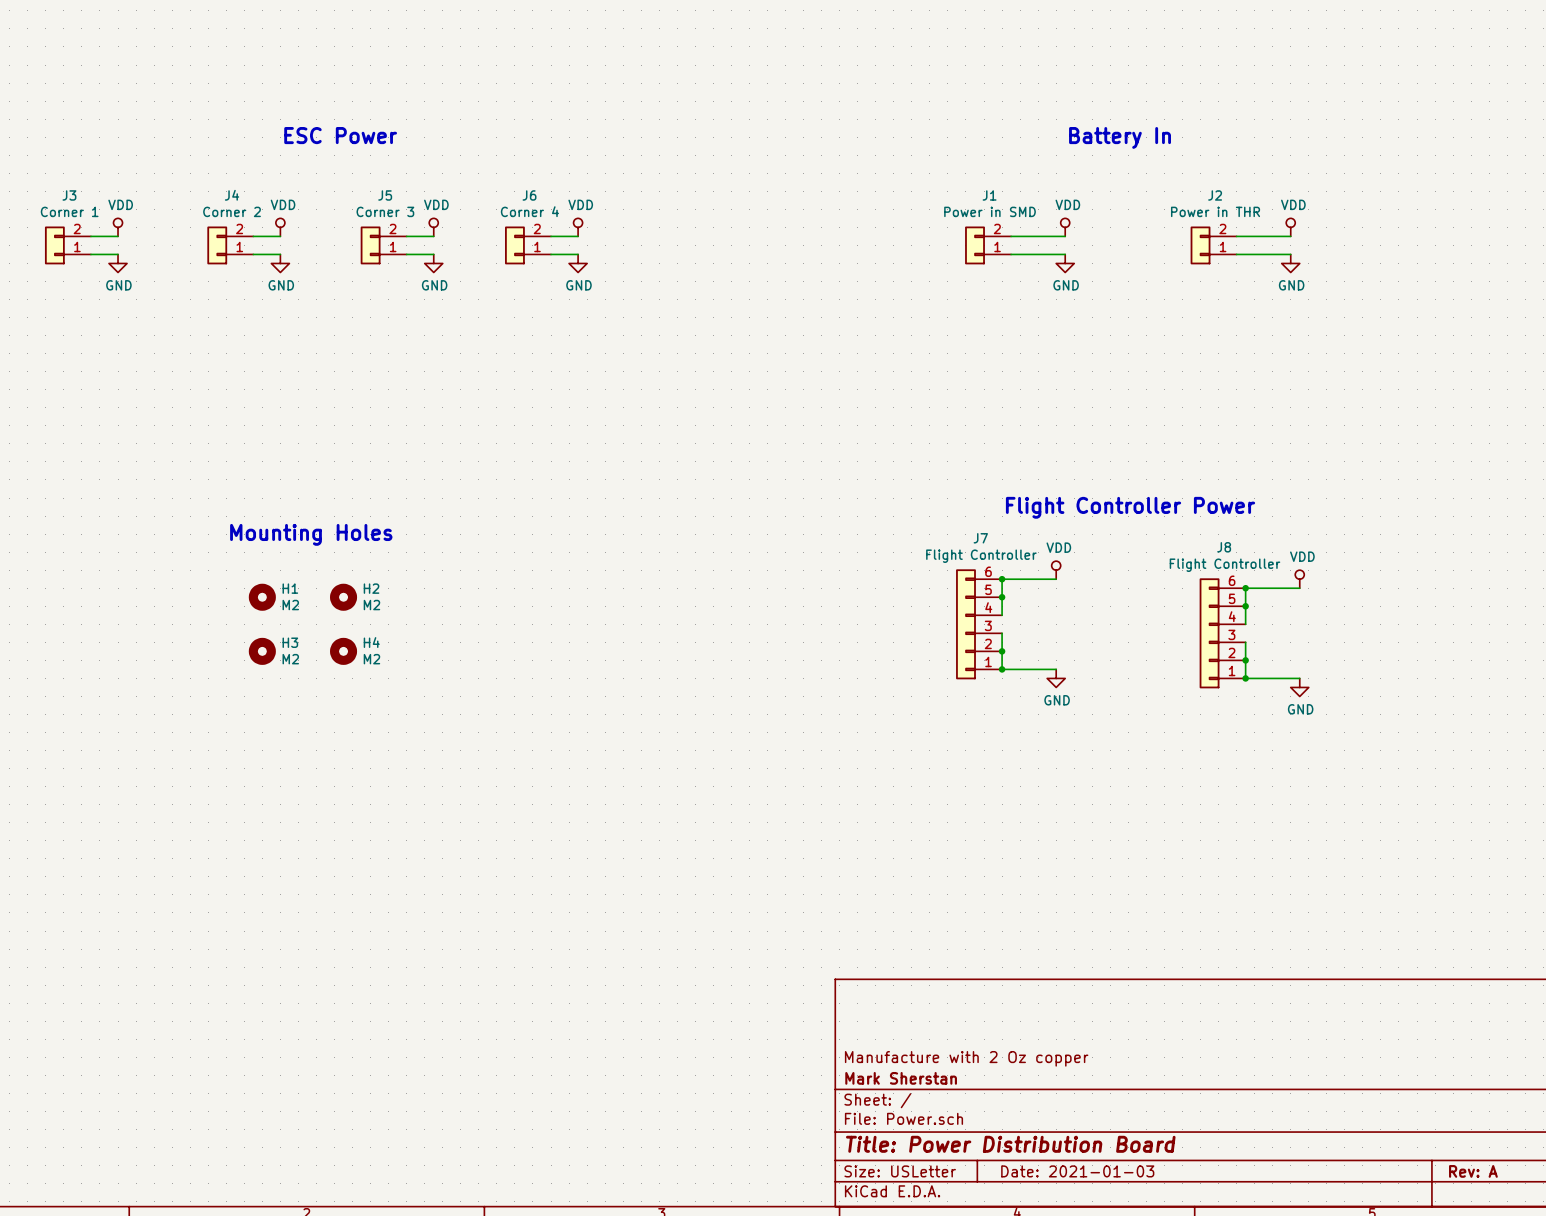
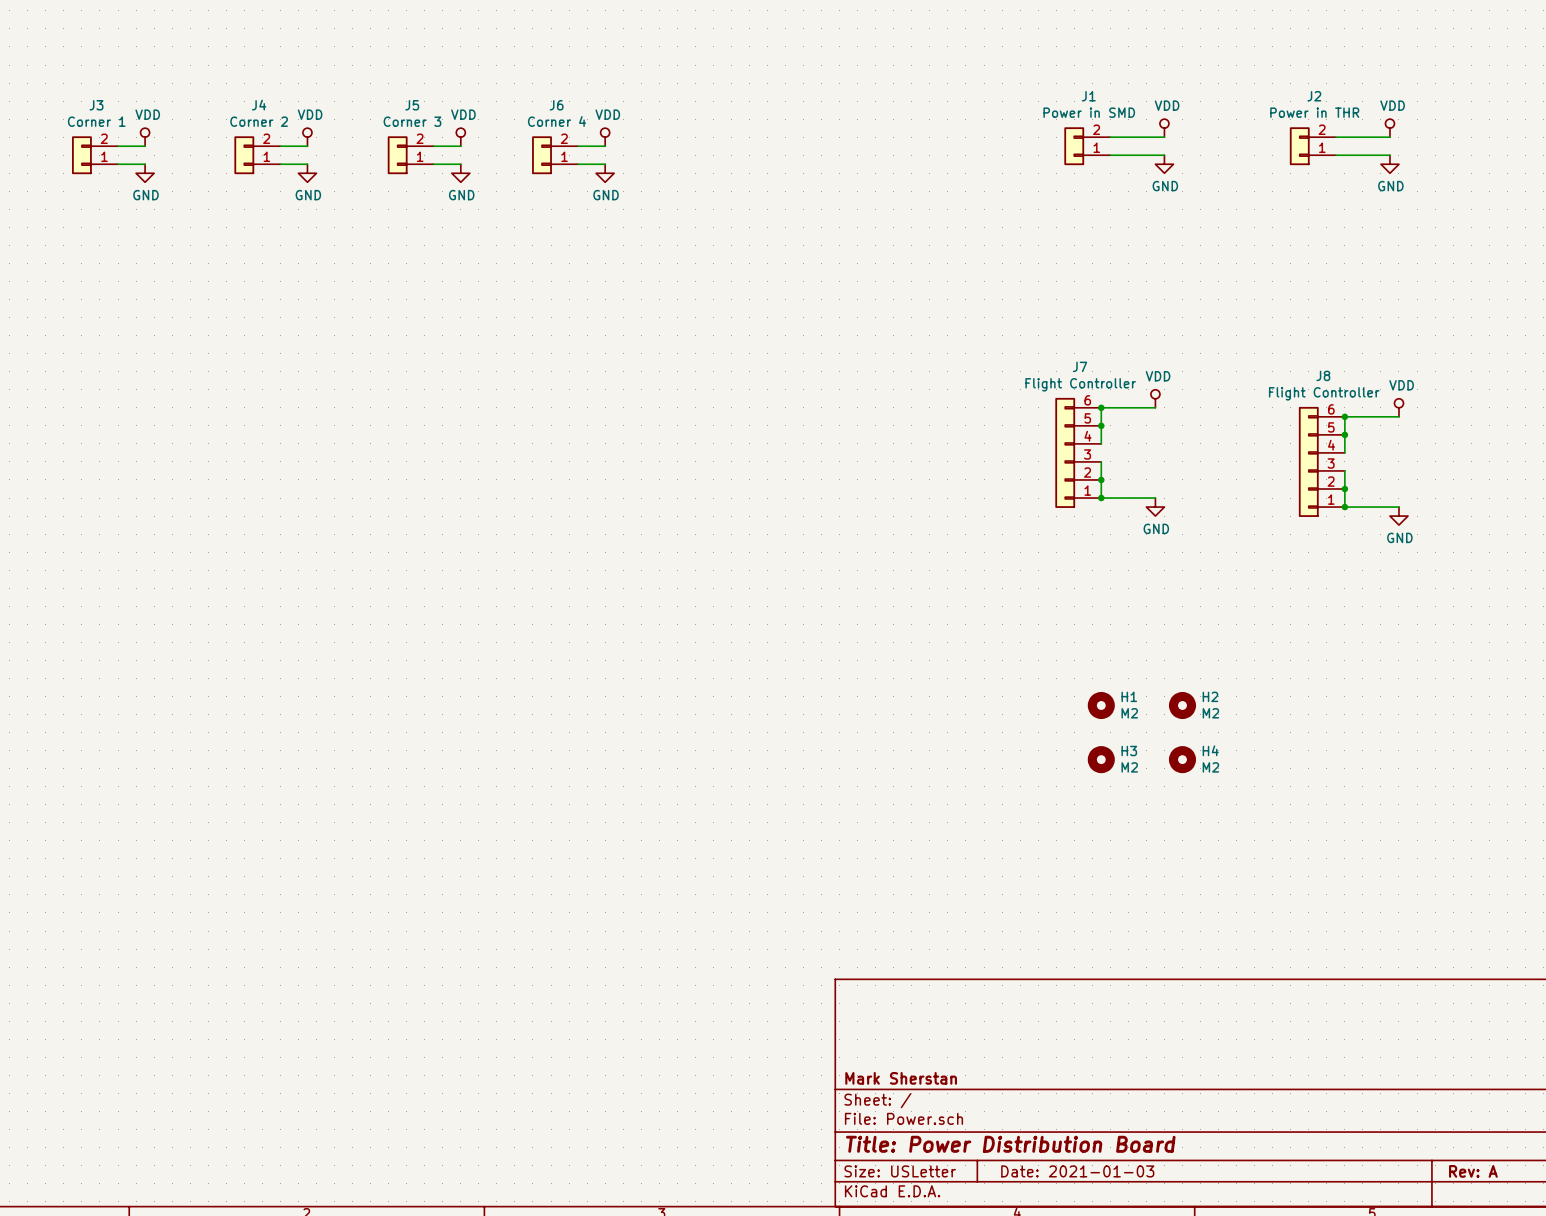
power symbol: none -> VDD (1164, 128)
power symbol: none -> VDD (1389, 128)
text: ESC Power (340, 135) -> none
power symbol: none -> VDD (145, 137)
power symbol: none -> VDD (307, 137)
power symbol: none -> VDD (460, 137)
power symbol: none -> VDD (605, 137)
text: Battery In (1120, 137) -> none
power symbol: none -> GND (1164, 164)
power symbol: none -> GND (1389, 164)
power symbol: none -> GND (145, 173)
power symbol: none -> GND (307, 173)
power symbol: none -> GND (460, 173)
power symbol: none -> GND (605, 173)
power symbol: VDD (118, 227) -> none
power symbol: VDD (280, 227) -> none
power symbol: VDD (433, 227) -> none
power symbol: VDD (578, 227) -> none
power symbol: VDD (1065, 227) -> none
power symbol: VDD (1290, 227) -> none
wire: (90, 236) (118, 236) -> (118, 146) (145, 146)
wire: (253, 236) (280, 236) -> (280, 146) (307, 146)
wire: (406, 236) (433, 236) -> (433, 146) (460, 146)
wire: (551, 236) (578, 236) -> (578, 146) (605, 146)
wire: (1011, 236) (1065, 236) -> (1110, 137) (1164, 137)
wire: (1236, 236) (1290, 236) -> (1335, 137) (1389, 137)
J3 position: (67, 245) -> (95, 155)
J4 position: (230, 245) -> (257, 155)
J5 position: (383, 245) -> (410, 155)
J6 position: (528, 245) -> (555, 155)
J1 position: (988, 245) -> (1087, 146)
J2 position: (1213, 245) -> (1312, 146)
wire: (90, 254) (118, 254) -> (118, 164) (145, 164)
wire: (253, 254) (280, 254) -> (280, 164) (307, 164)
wire: (406, 254) (433, 254) -> (433, 164) (460, 164)
wire: (551, 254) (578, 254) -> (578, 164) (605, 164)
wire: (1011, 254) (1065, 254) -> (1110, 155) (1164, 155)
wire: (1236, 254) (1290, 254) -> (1335, 155) (1389, 155)
power symbol: GND (118, 263) -> none
power symbol: GND (280, 263) -> none
power symbol: GND (433, 263) -> none
power symbol: GND (578, 263) -> none
power symbol: GND (1065, 263) -> none
power symbol: GND (1290, 263) -> none
power symbol: none -> VDD (1155, 398)
junction: none -> (1101, 407)
wire: none -> (1155, 407) (1101, 407) (1101, 443)
power symbol: none -> VDD (1398, 407)
junction: none -> (1344, 416)
wire: none -> (1398, 416) (1344, 416) (1344, 452)
junction: none -> (1101, 425)
junction: none -> (1344, 434)
wire: none -> (1101, 461) (1101, 498) (1155, 498)
wire: none -> (1344, 470) (1344, 507) (1398, 507)
junction: none -> (1101, 479)
junction: none -> (1344, 489)
junction: none -> (1101, 498)
text: Flight Controller Power (1130, 507) -> none
power symbol: none -> GND (1155, 507)
junction: none -> (1344, 507)
power symbol: none -> GND (1398, 516)
text: Mounting Holes (311, 534) -> none
power symbol: VDD (1056, 570) -> none
junction: (1002, 579) -> none
wire: (1056, 579) (1002, 579) (1002, 615) -> none
power symbol: VDD (1299, 579) -> none
junction: (1245, 588) -> none
wire: (1299, 588) (1245, 588) (1245, 624) -> none
H1 position: (262, 597) -> (1101, 705)
H2 position: (343, 597) -> (1182, 705)
junction: (1002, 597) -> none
junction: (1245, 606) -> none
J7 position: (979, 624) -> (1078, 452)
wire: (1002, 633) (1002, 669) (1056, 669) -> none
J8 position: (1222, 633) -> (1321, 461)
wire: (1245, 642) (1245, 678) (1299, 678) -> none
H3 position: (262, 651) -> (1101, 759)
H4 position: (343, 651) -> (1182, 759)
junction: (1002, 651) -> none
junction: (1245, 660) -> none
junction: (1002, 669) -> none
power symbol: GND (1056, 678) -> none
junction: (1245, 678) -> none
power symbol: GND (1299, 687) -> none
title block: Manufacture with 2 Oz copper (966, 1058) -> none

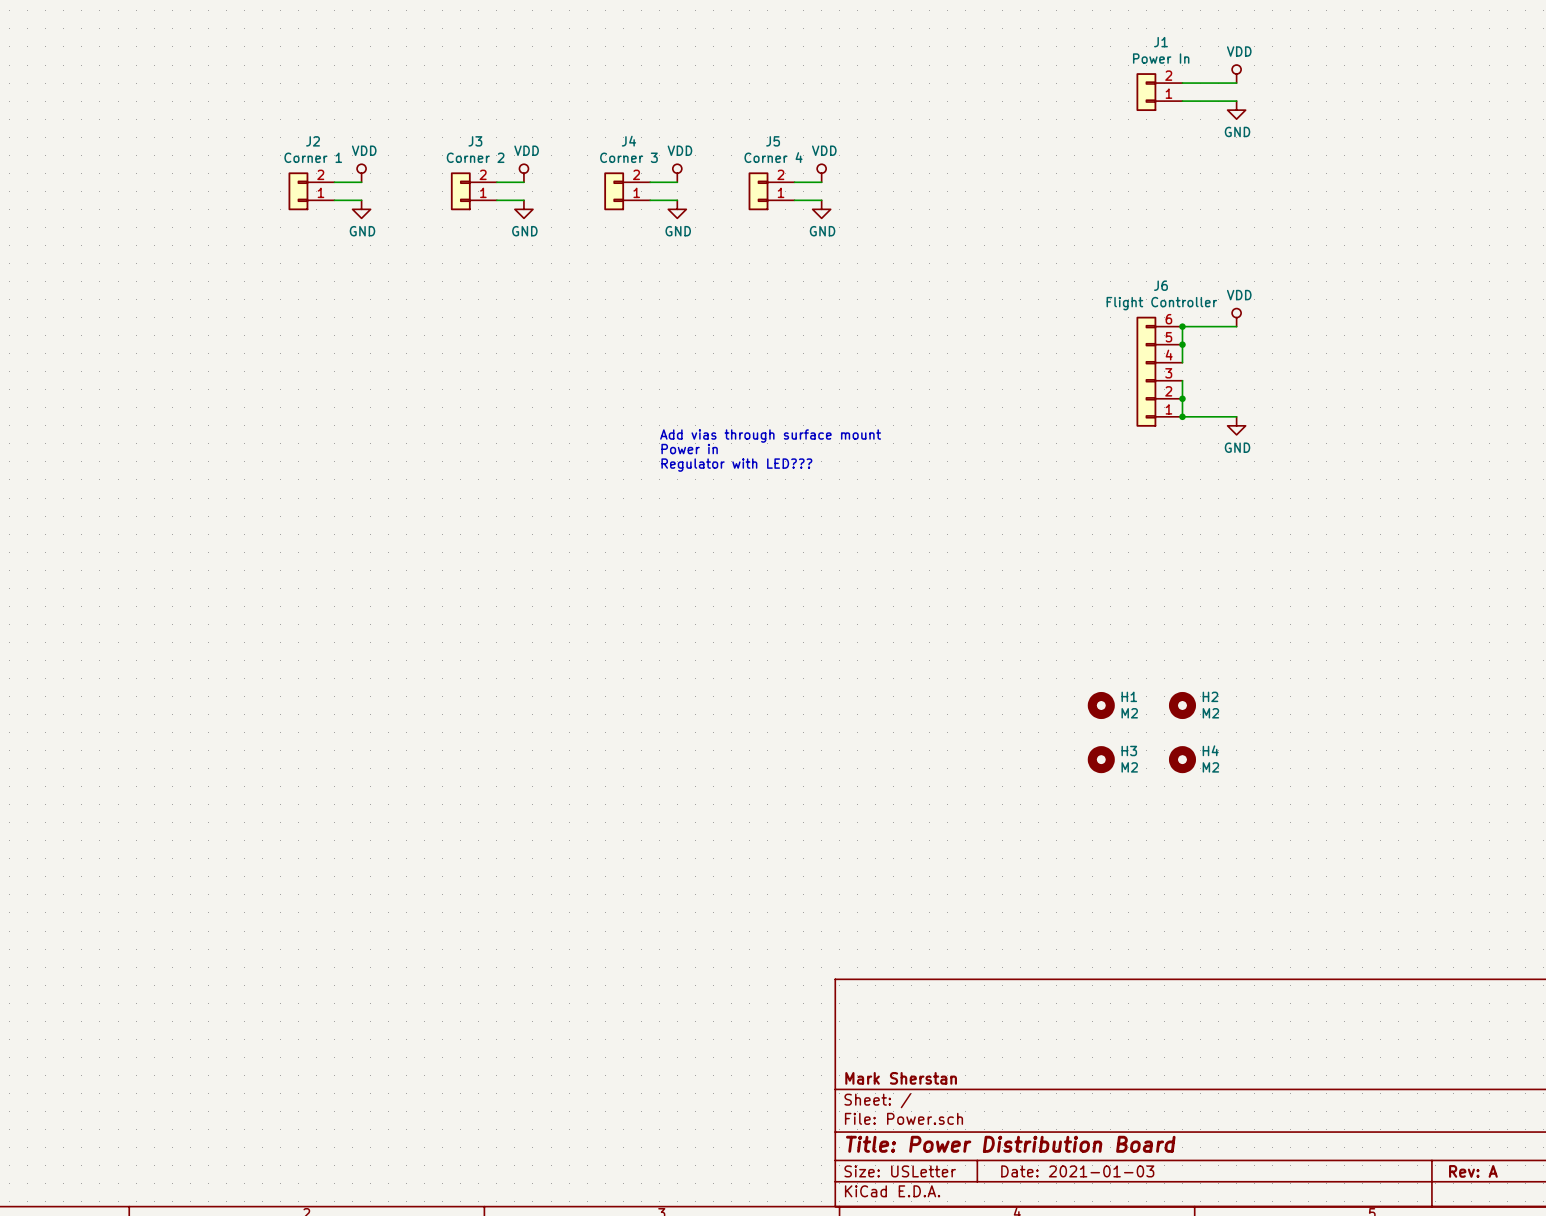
power symbol: none -> VDD (1236, 74)
J6 name position: J6 (556, 105) -> J6 (1160, 285)
power symbol: none -> GND (1236, 110)
J1 value: Power in SMD (1089, 112) -> Power In (1161, 58)
J2 value: Power in THR (1314, 112) -> Corner 1 (313, 157)
J3 value: Corner 1 (96, 121) -> Corner 2 (475, 157)
J4 value: Corner 2 (259, 121) -> Corner 3 (628, 157)
J5 value: Corner 3 (412, 121) -> Corner 4 (773, 157)
J6 value: Corner 4 (557, 121) -> Flight Controller (1161, 303)
power symbol: VDD (1164, 128) -> none
power symbol: VDD (1389, 128) -> none
J6 symbol: [532, 136, 579, 175] -> [1136, 316, 1183, 427]
power symbol: VDD (145, 137) -> none
power symbol: VDD (307, 137) -> none
power symbol: VDD (460, 137) -> none
power symbol: VDD (605, 137) -> none
wire: (1110, 137) (1164, 137) -> (1182, 83) (1236, 83)
wire: (1335, 137) (1389, 137) -> none
wire: (118, 146) (145, 146) -> none
wire: (280, 146) (307, 146) -> (334, 182) (361, 182)
wire: (433, 146) (460, 146) -> (496, 182) (523, 182)
wire: (578, 146) (605, 146) -> (650, 182) (677, 182)
J1 position: (1087, 146) -> (1159, 92)
J2 position: (1312, 146) -> (311, 191)
J3 position: (95, 155) -> (473, 191)
J4 position: (257, 155) -> (627, 191)
J5 position: (410, 155) -> (771, 191)
wire: (1110, 155) (1164, 155) -> (1182, 101) (1236, 101)
wire: (1335, 155) (1389, 155) -> none
wire: (118, 164) (145, 164) -> none
wire: (280, 164) (307, 164) -> (334, 200) (361, 200)
wire: (433, 164) (460, 164) -> (496, 200) (523, 200)
wire: (578, 164) (605, 164) -> (650, 200) (677, 200)
power symbol: GND (1164, 164) -> none
power symbol: GND (1389, 164) -> none
power symbol: GND (145, 173) -> none
power symbol: GND (307, 173) -> none
power symbol: none -> VDD (361, 173)
power symbol: GND (460, 173) -> none
power symbol: none -> VDD (523, 173)
power symbol: GND (605, 173) -> none
power symbol: none -> VDD (677, 173)
power symbol: none -> VDD (821, 173)
wire: none -> (794, 182) (821, 182)
wire: none -> (794, 200) (821, 200)
power symbol: none -> GND (361, 209)
power symbol: none -> GND (523, 209)
power symbol: none -> GND (677, 209)
power symbol: none -> GND (821, 209)
power symbol: none -> VDD (1236, 317)
junction: none -> (1182, 326)
junction: none -> (1182, 344)
power symbol: VDD (1155, 398) -> none
junction: none -> (1182, 398)
junction: (1101, 407) -> none
wire: (1155, 407) (1101, 407) (1101, 443) -> (1236, 326) (1182, 326) (1182, 362)
power symbol: VDD (1398, 407) -> none
junction: none -> (1182, 416)
junction: (1344, 416) -> none
wire: (1398, 416) (1344, 416) (1344, 452) -> none
junction: (1101, 425) -> none
power symbol: none -> GND (1236, 425)
junction: (1344, 434) -> none
text: none -> Add vias through surface mount (770, 436)
text: none -> Power in (689, 449)
J7: Flight Controller (1078, 452) -> none
wire: (1101, 461) (1101, 498) (1155, 498) -> (1182, 380) (1182, 416) (1236, 416)
J8: Flight Controller (1321, 461) -> none
text: none -> Regulator with LED??? (736, 465)
wire: (1344, 470) (1344, 507) (1398, 507) -> none
junction: (1101, 479) -> none
junction: (1344, 489) -> none
junction: (1101, 498) -> none
power symbol: GND (1155, 507) -> none
junction: (1344, 507) -> none
power symbol: GND (1398, 516) -> none

